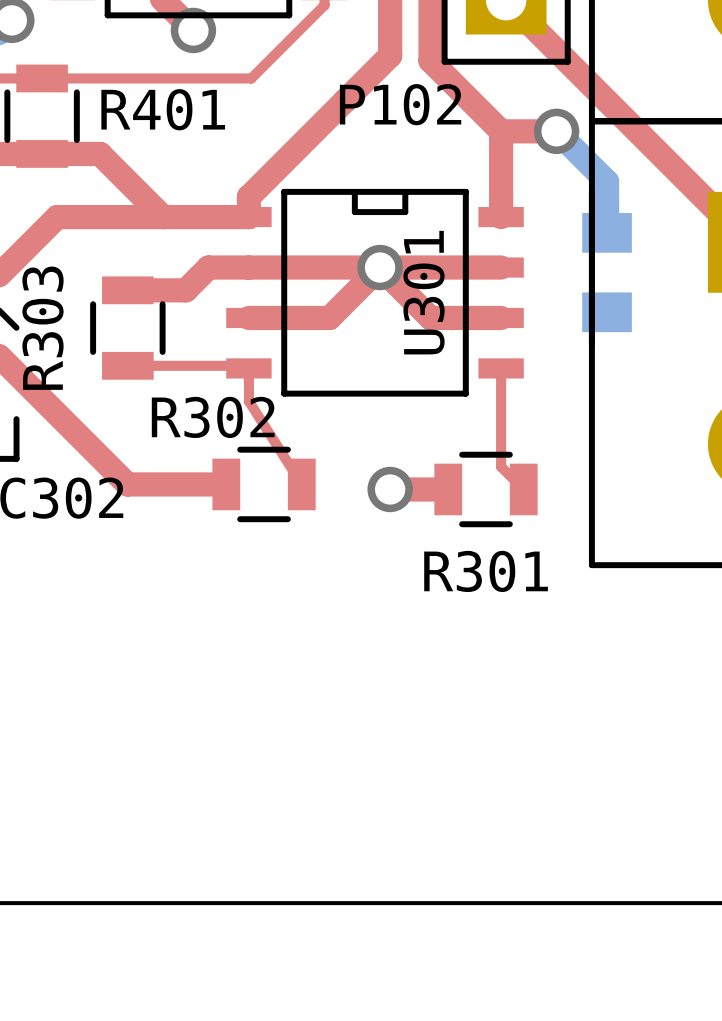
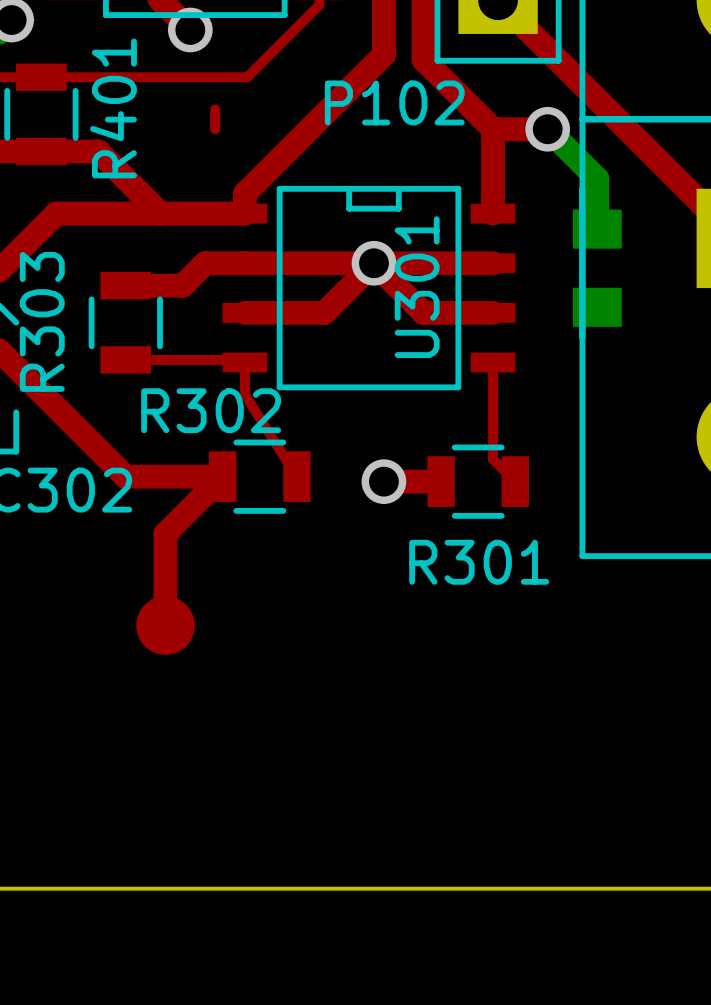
R401 name rotation: 0° (163, 109) -> 90° counterclockwise (113, 108)
top track: none -> (215, 109) (215, 129)
top track: none -> (222, 476) (165, 533) (165, 625)
part: none -> (165, 625)

